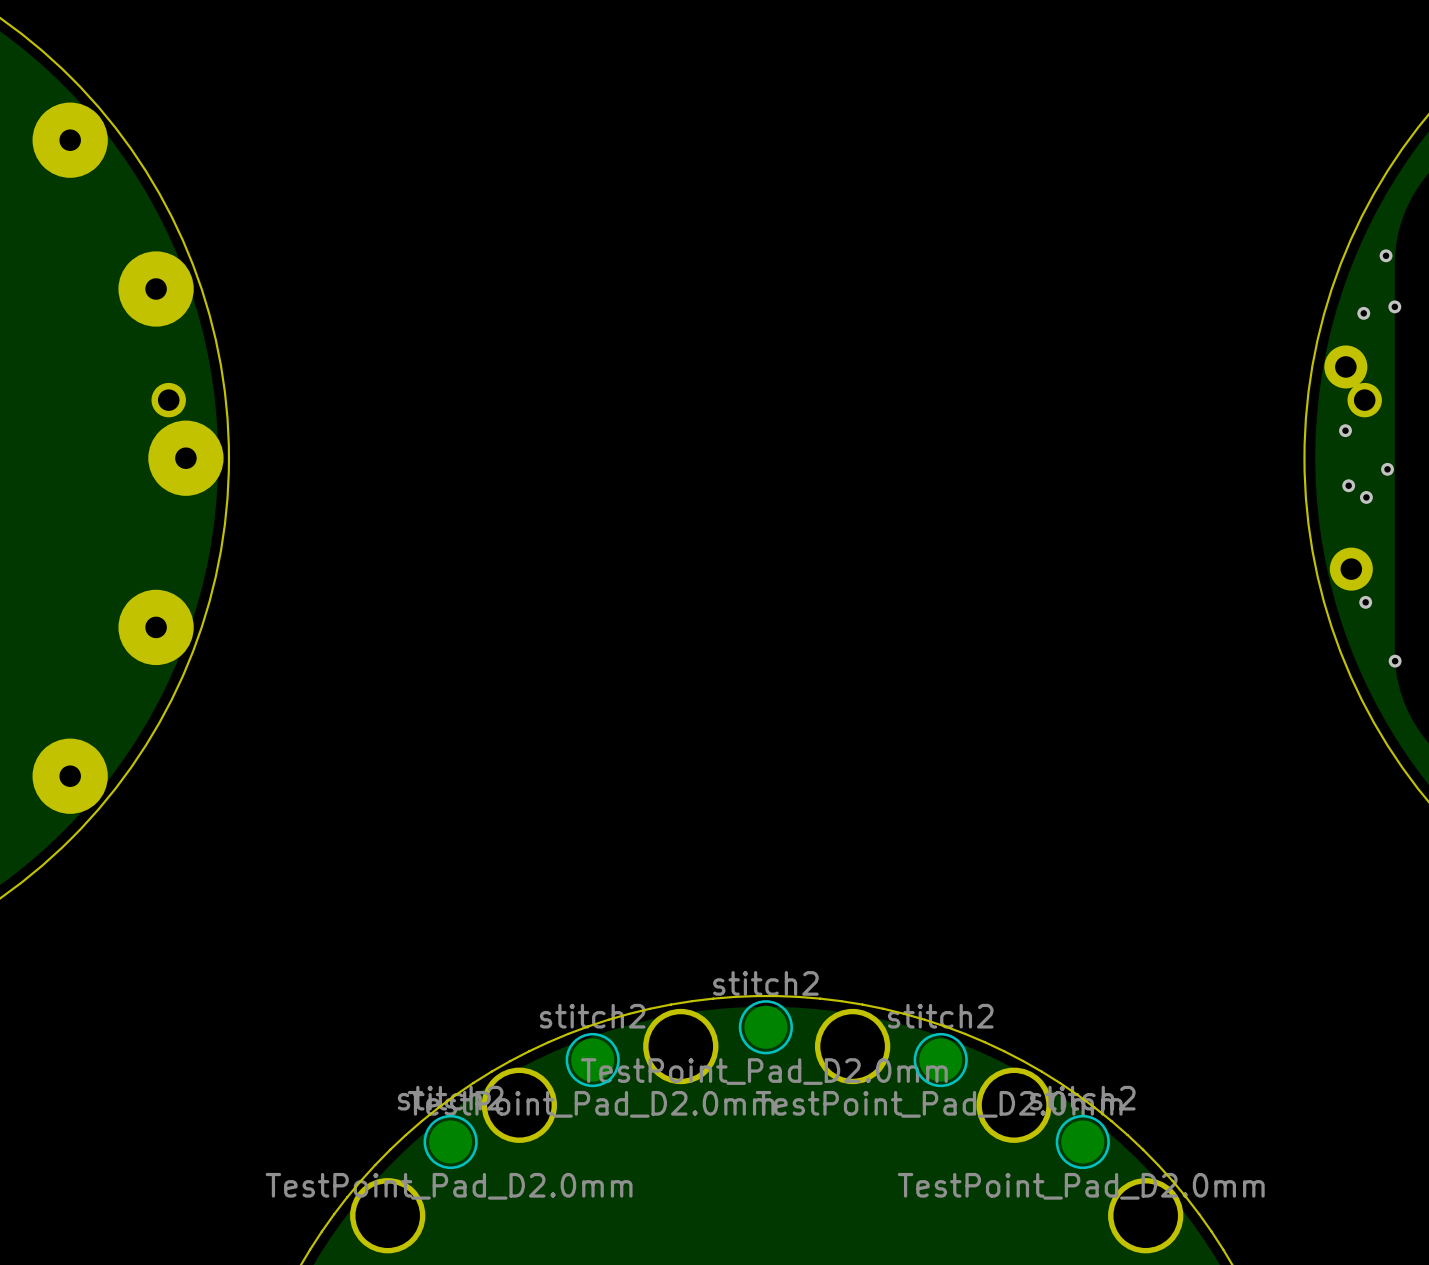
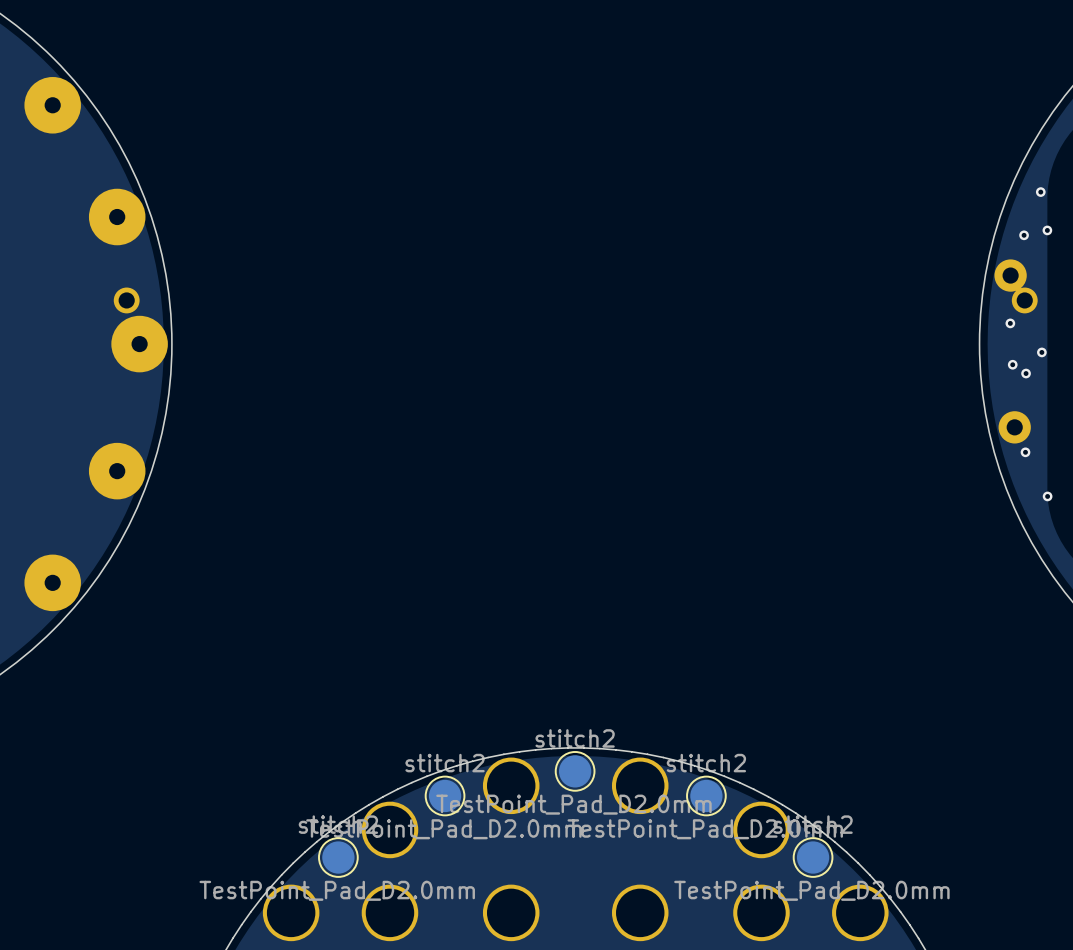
part: none -> (389, 912)
part: none -> (511, 912)
part: none -> (640, 912)
part: none -> (761, 912)

